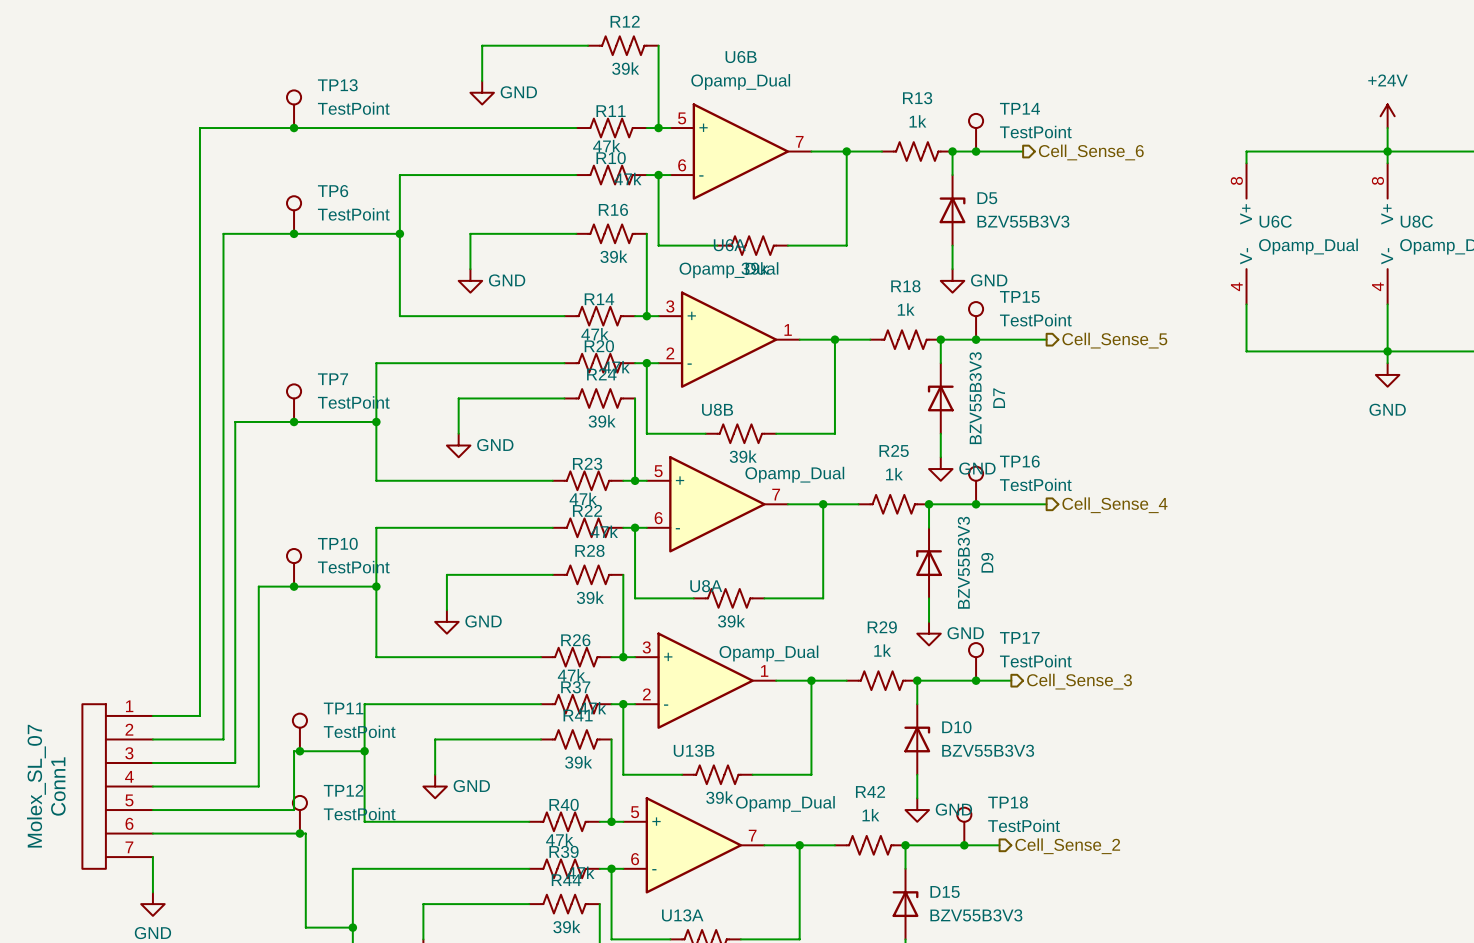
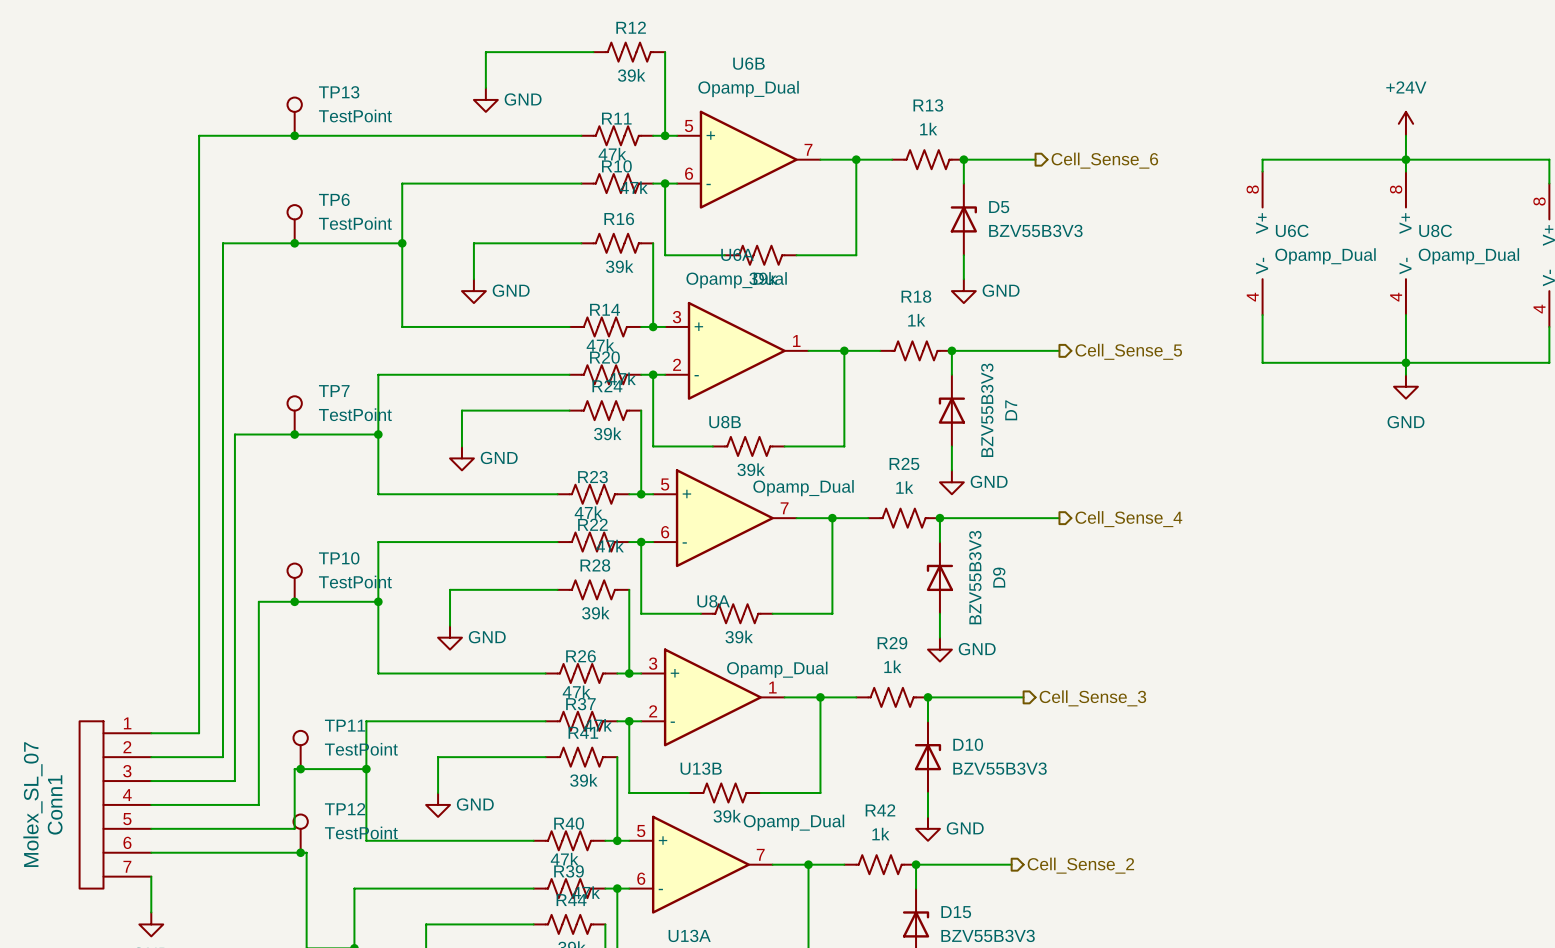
TP14: TestPoint (976, 132) -> none
junction: (976, 151) -> none
TP15: TestPoint (976, 320) -> none
junction: (976, 339) -> none
TP16: TestPoint (976, 485) -> none
junction: (976, 504) -> none
TP17: TestPoint (976, 661) -> none
junction: (976, 680) -> none
TP18: TestPoint (964, 826) -> none
junction: (964, 845) -> none

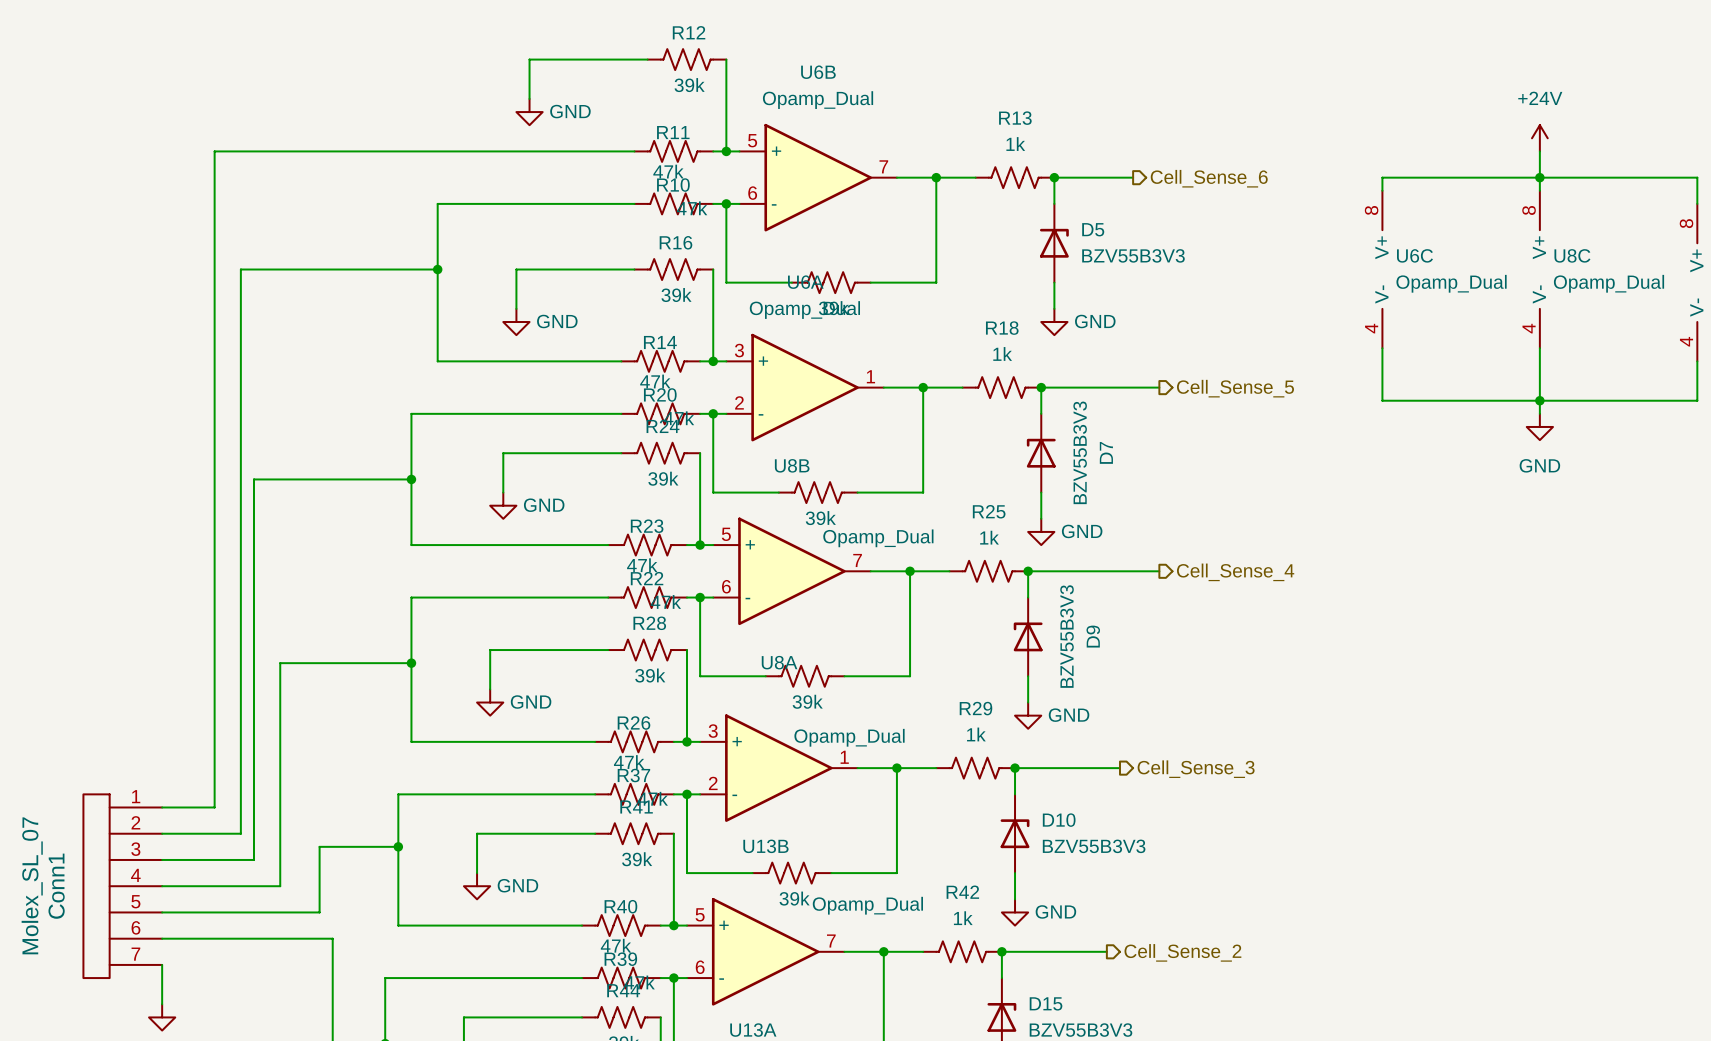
TP13: TestPoint (294, 116) -> none
junction: (294, 135) -> none
TP6: TestPoint (294, 224) -> none
junction: (294, 243) -> none
TP7: TestPoint (294, 415) -> none
junction: (294, 434) -> none
TP10: TestPoint (294, 582) -> none
junction: (294, 601) -> none
TP11: TestPoint (300, 749) -> none
junction: (300, 769) -> none
TP12: TestPoint (300, 833) -> none
junction: (300, 852) -> none

